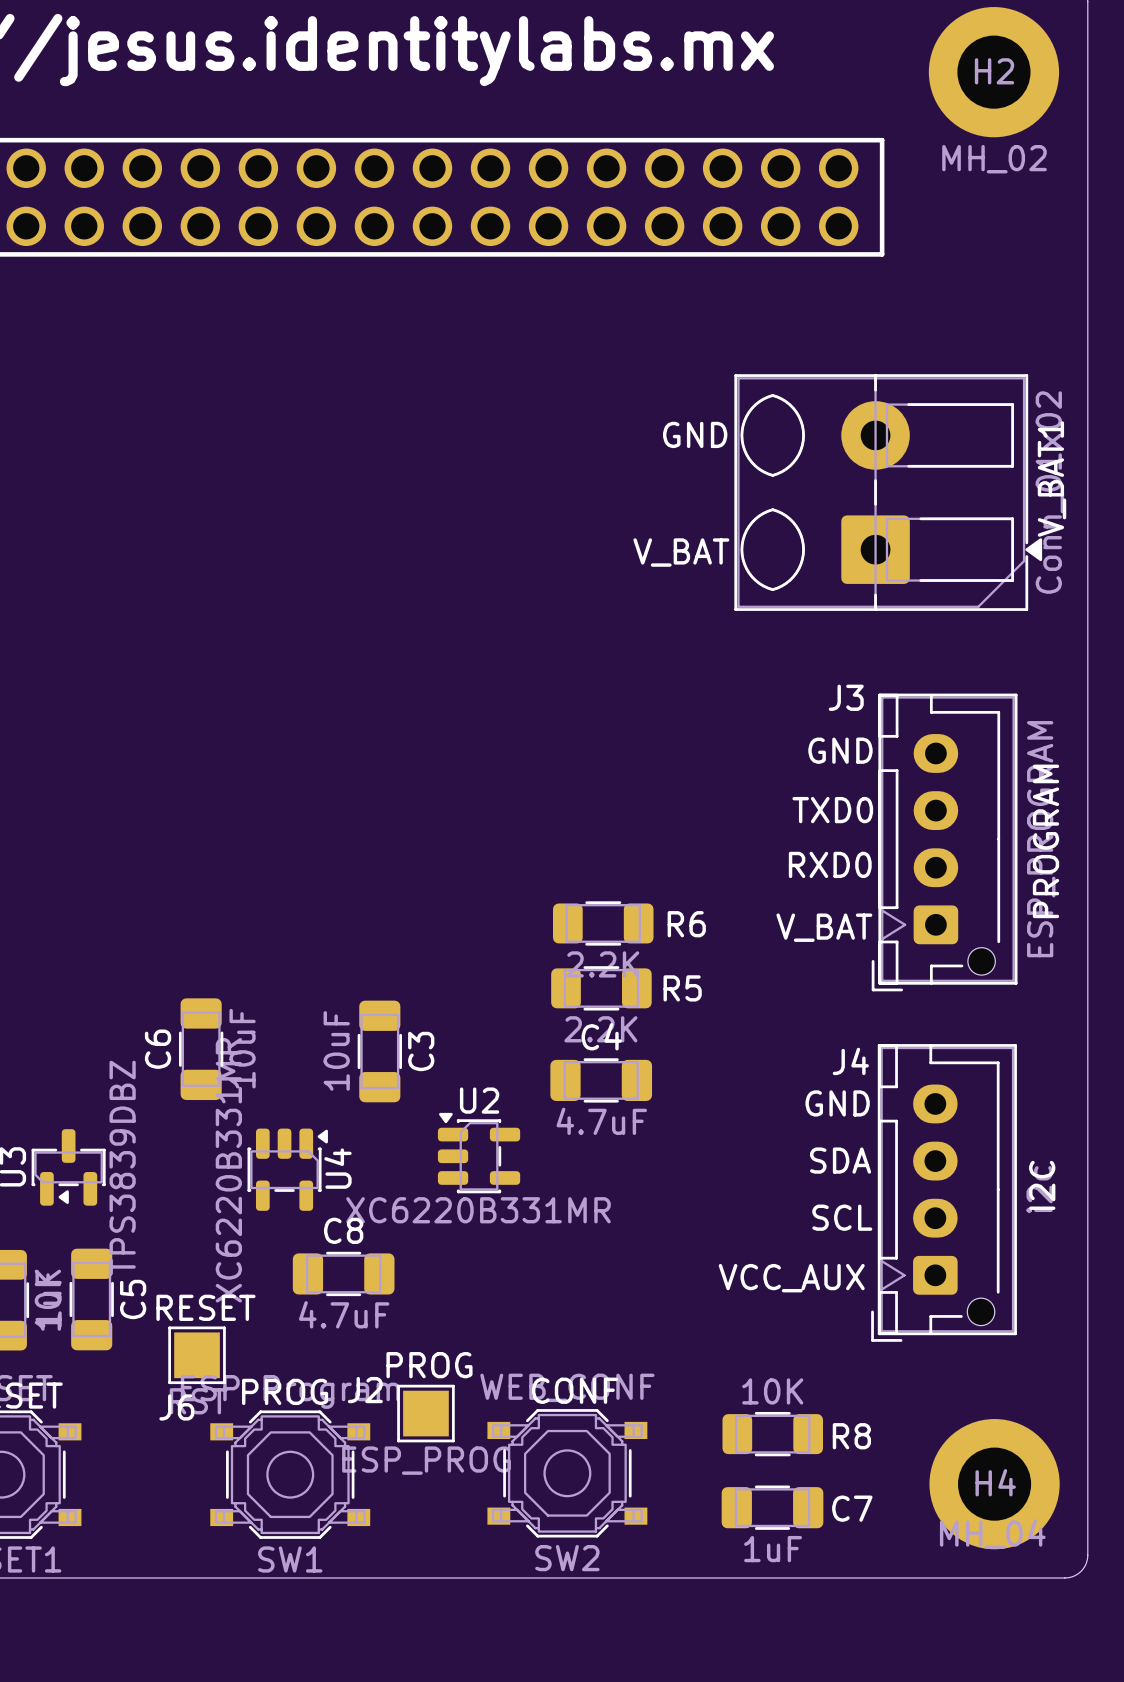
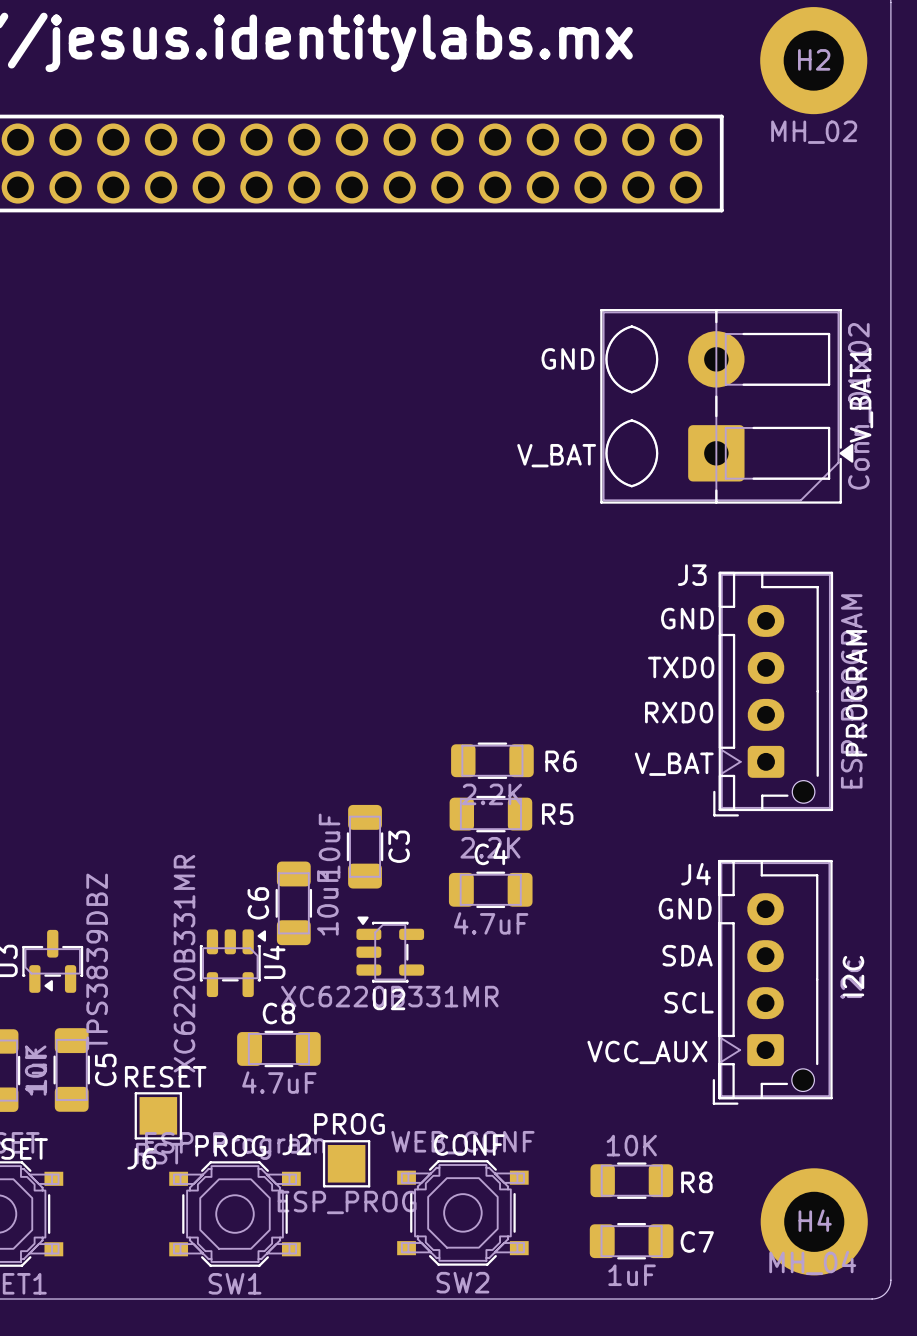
C6 position: (201, 1049) -> (293, 903)
C3 position: (379, 1051) -> (365, 846)
U2 name position: U2 (479, 1100) -> U2 (389, 999)

